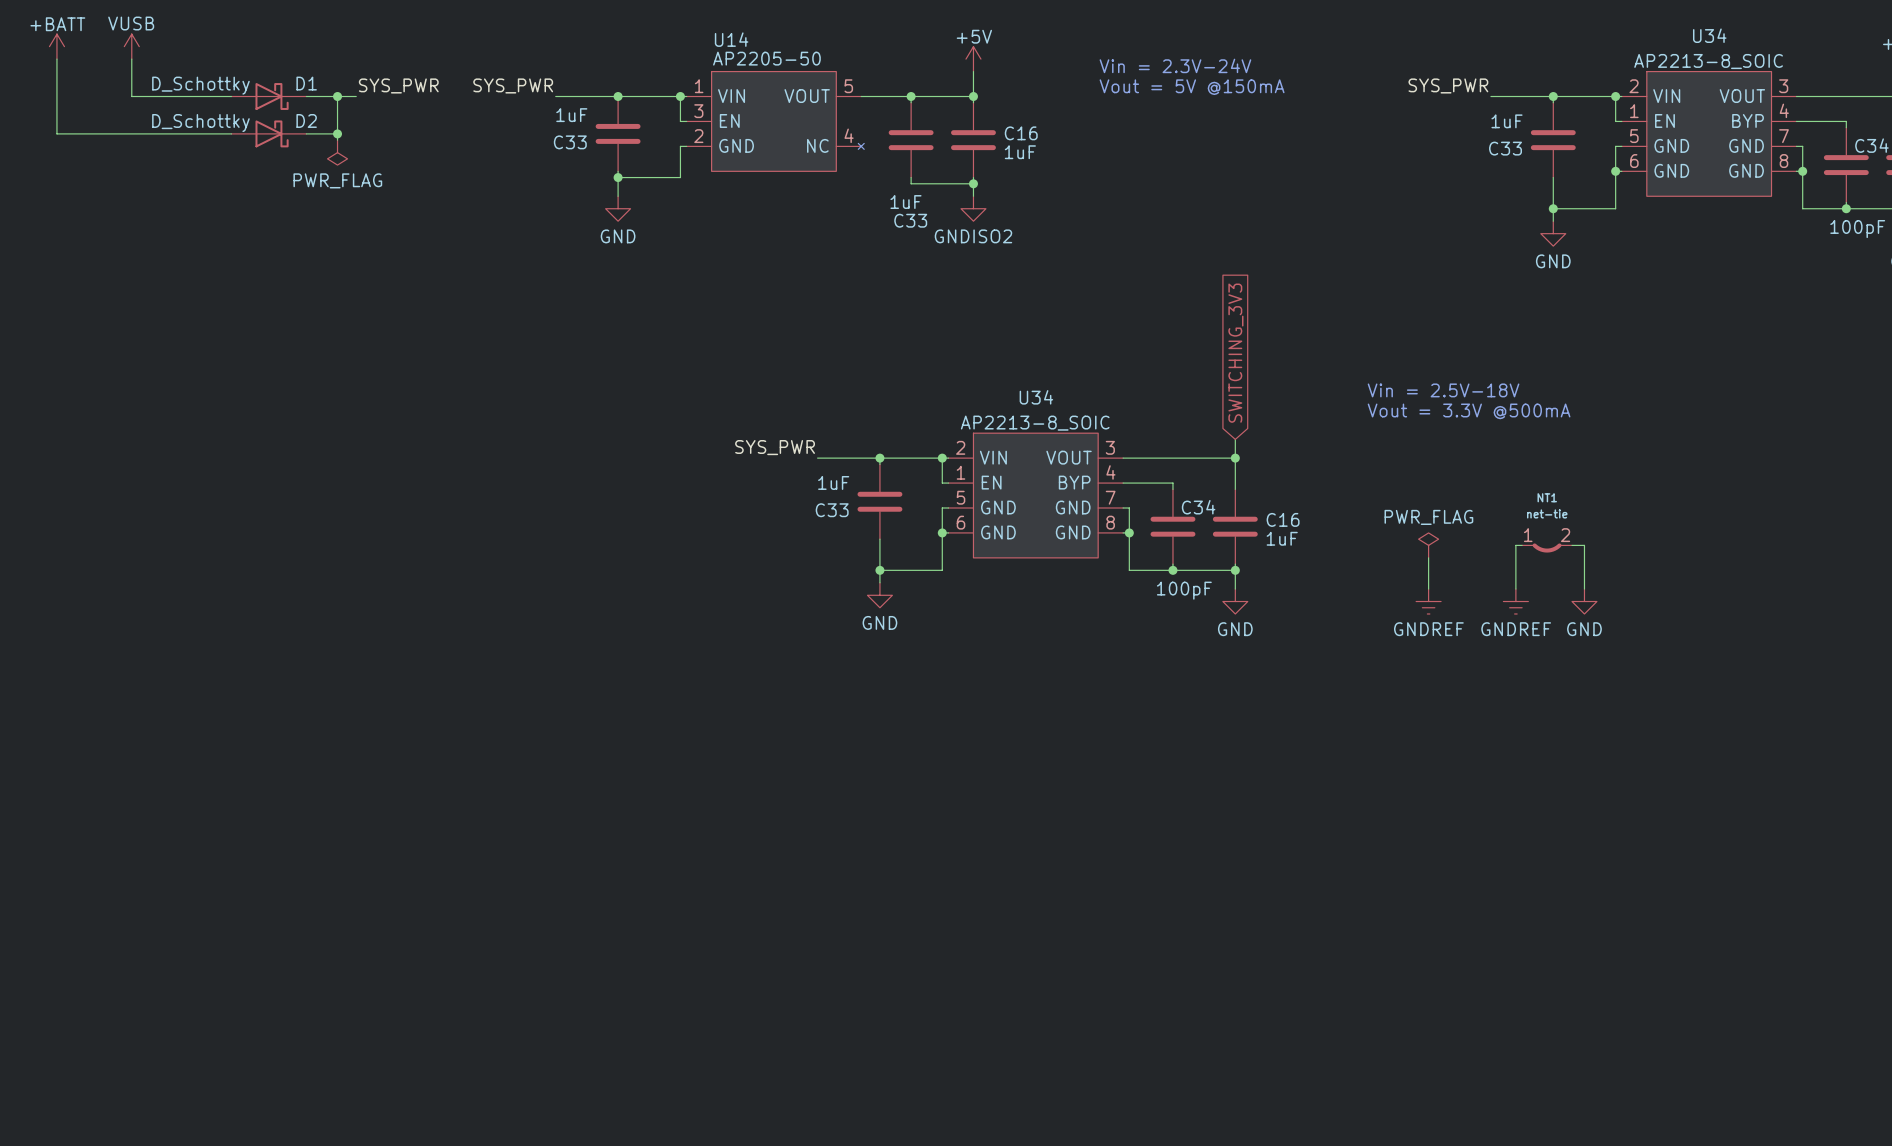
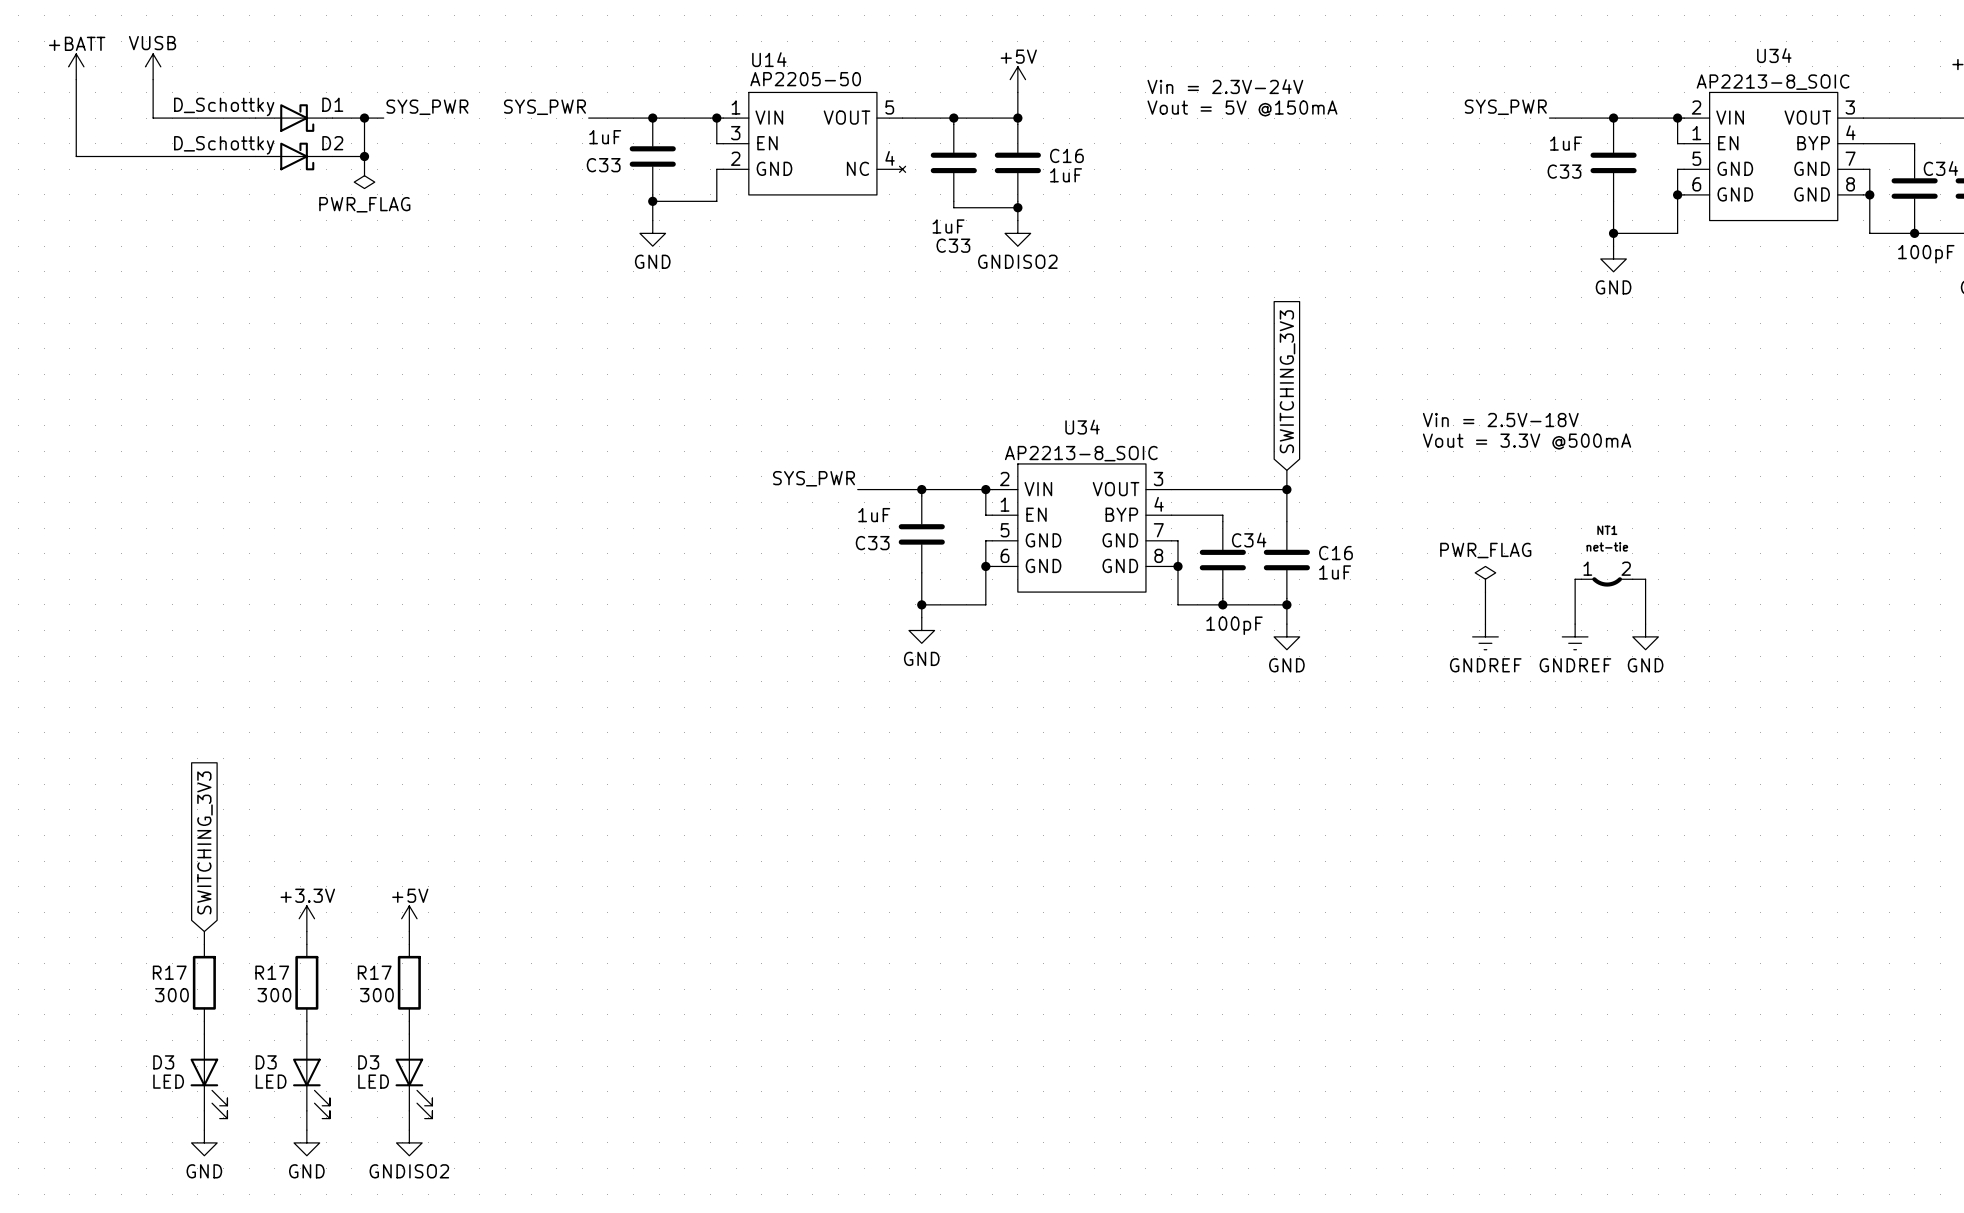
global label: none -> SWITCHING_3V3 (204, 842)
power symbol: none -> +3.3V (306, 918)
power symbol: none -> +5V (409, 918)
wire: none -> (204, 931) (204, 944)
wire: none -> (306, 931) (306, 944)
wire: none -> (409, 931) (409, 944)
R17: none -> 300 (204, 982)
R17: none -> 300 (306, 982)
R17: none -> 300 (409, 982)
wire: none -> (204, 1021) (204, 1034)
wire: none -> (306, 1021) (306, 1034)
wire: none -> (409, 1021) (409, 1034)
D3: none -> LED (208, 1076)
D3: none -> LED (311, 1076)
D3: none -> LED (413, 1076)
wire: none -> (204, 1110) (204, 1130)
wire: none -> (306, 1110) (306, 1130)
wire: none -> (409, 1110) (409, 1130)
power symbol: none -> GND (204, 1142)
power symbol: none -> GND (306, 1142)
power symbol: none -> GNDISO2 (409, 1142)

